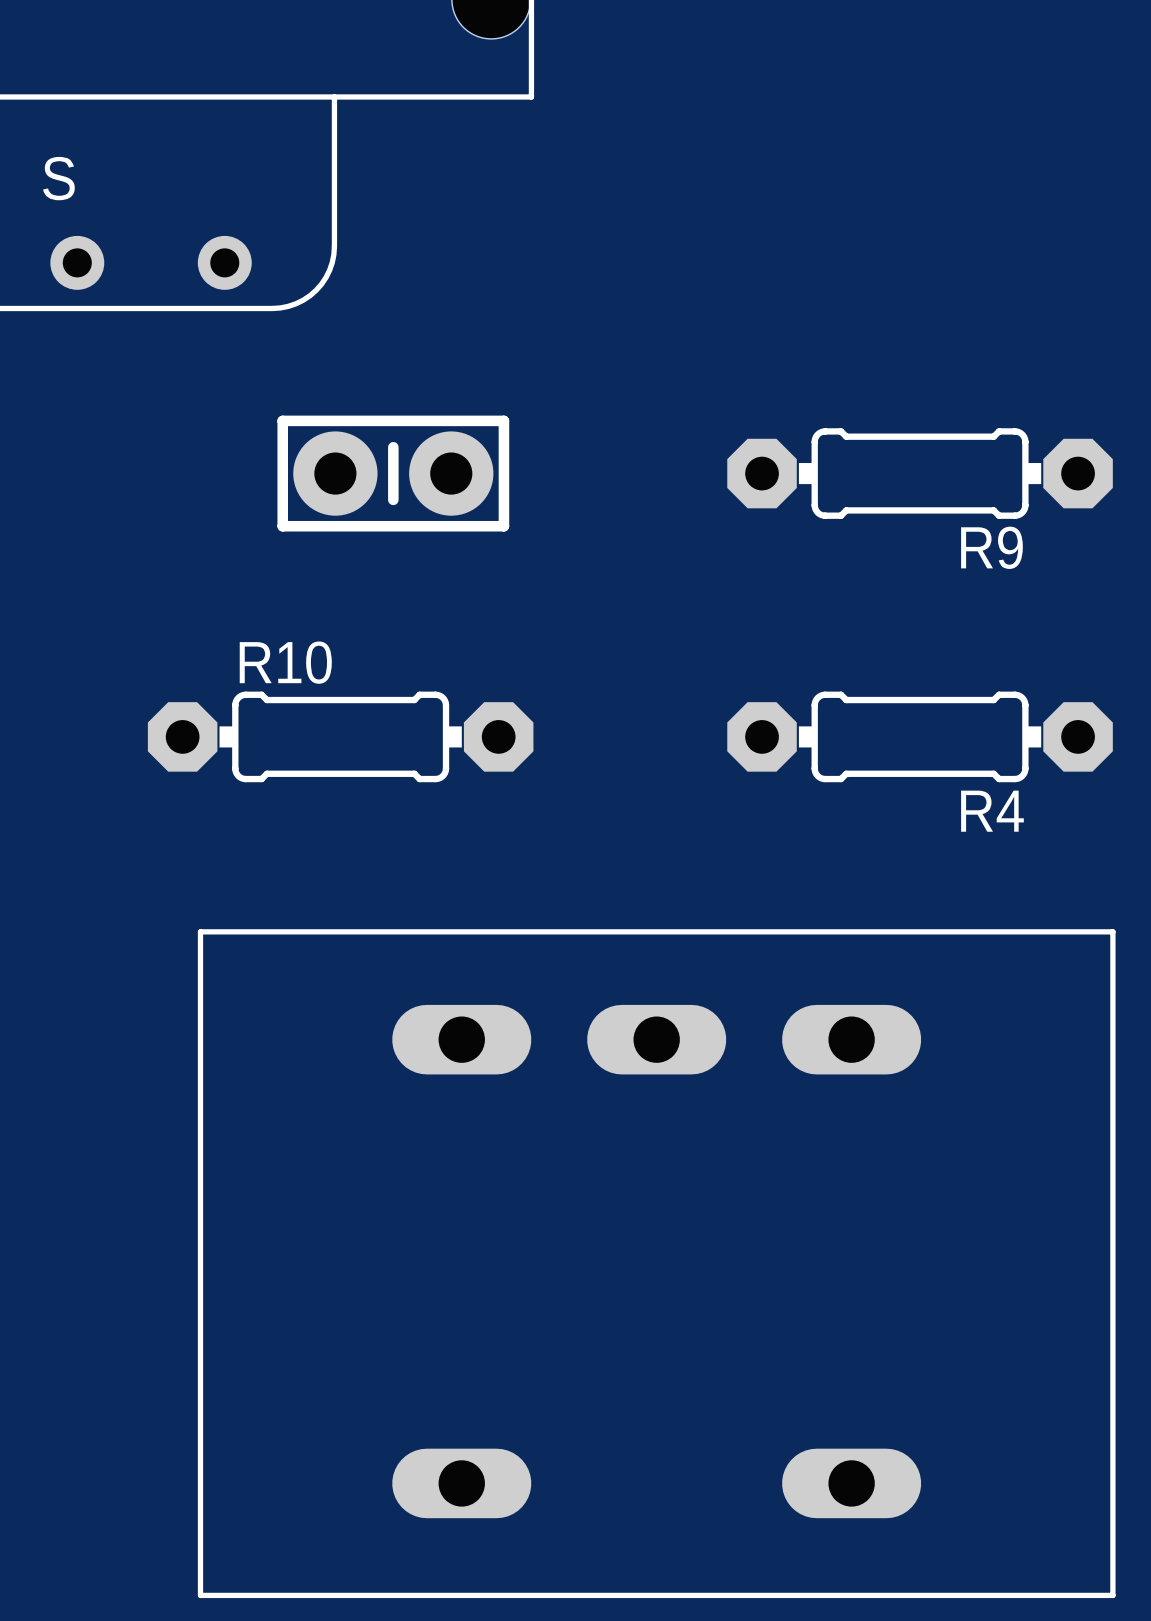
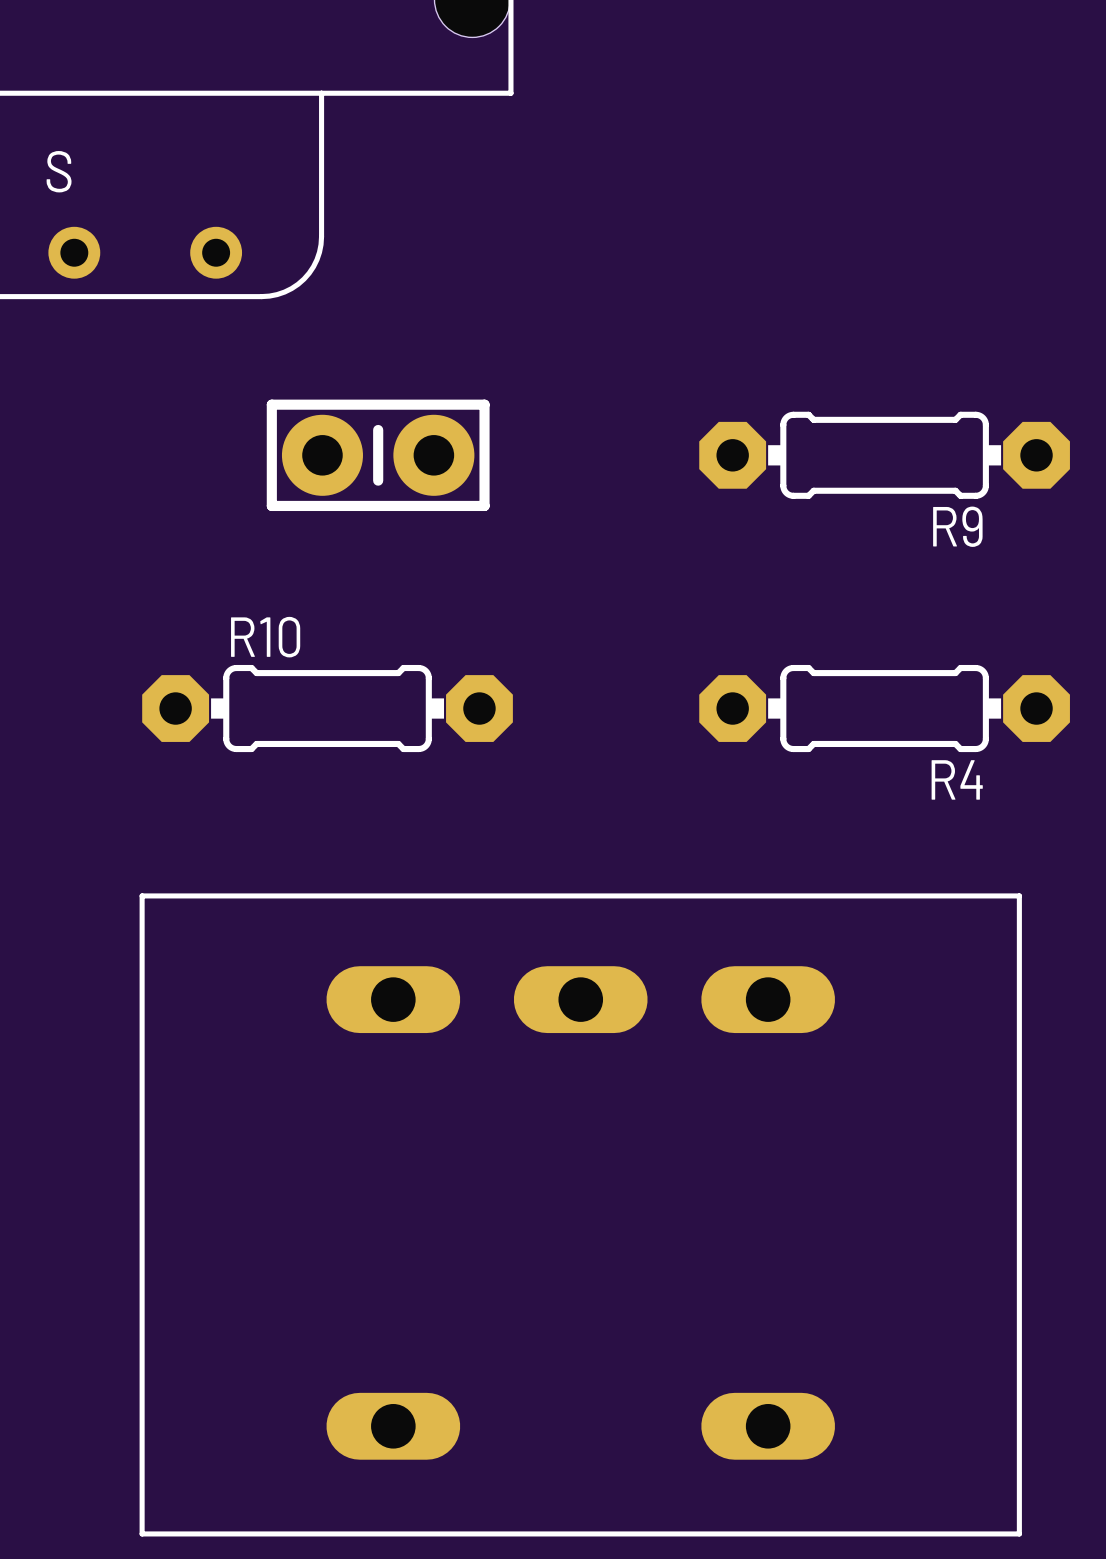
part position: (656, 1263) -> (580, 1214)

